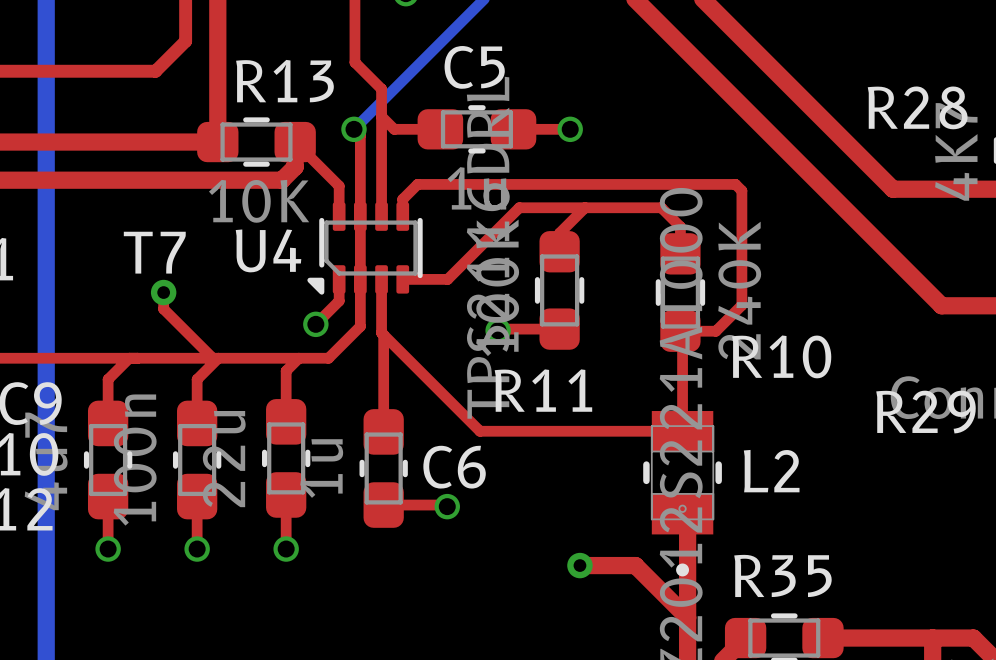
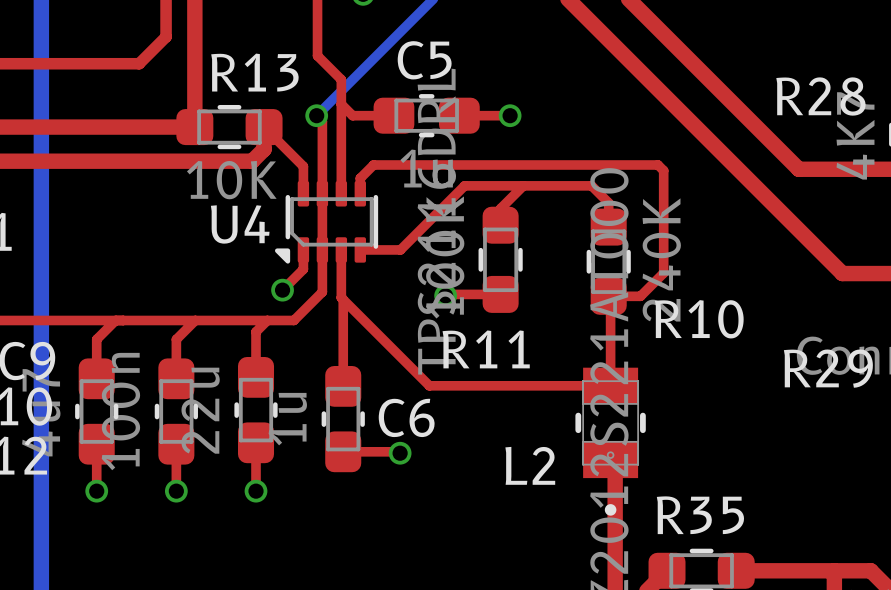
text: T7 (154, 252) -> none
top track: (163, 292) (163, 309) (212, 358) -> none
via: (163, 292) -> none
L2 name position: L2 (771, 471) -> L2 (530, 465)
top track: (579, 565) (635, 565) (687, 617) -> none
via: (579, 565) -> none

